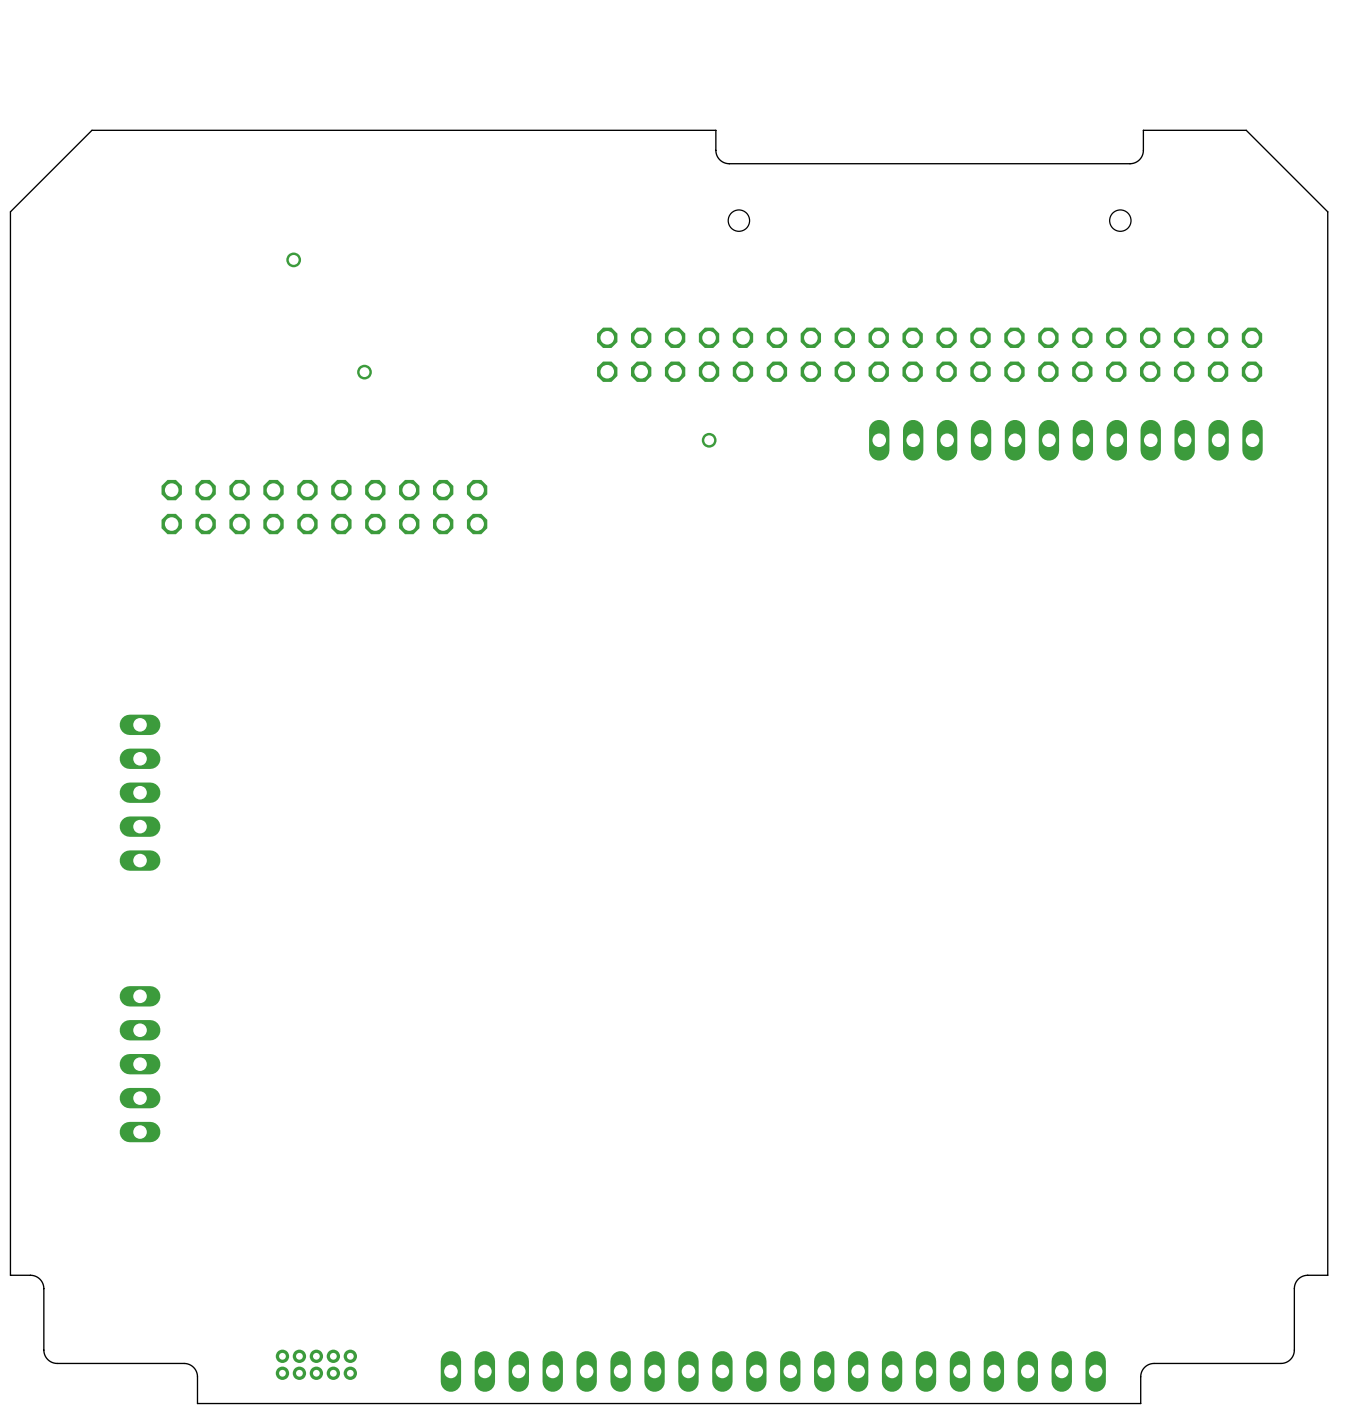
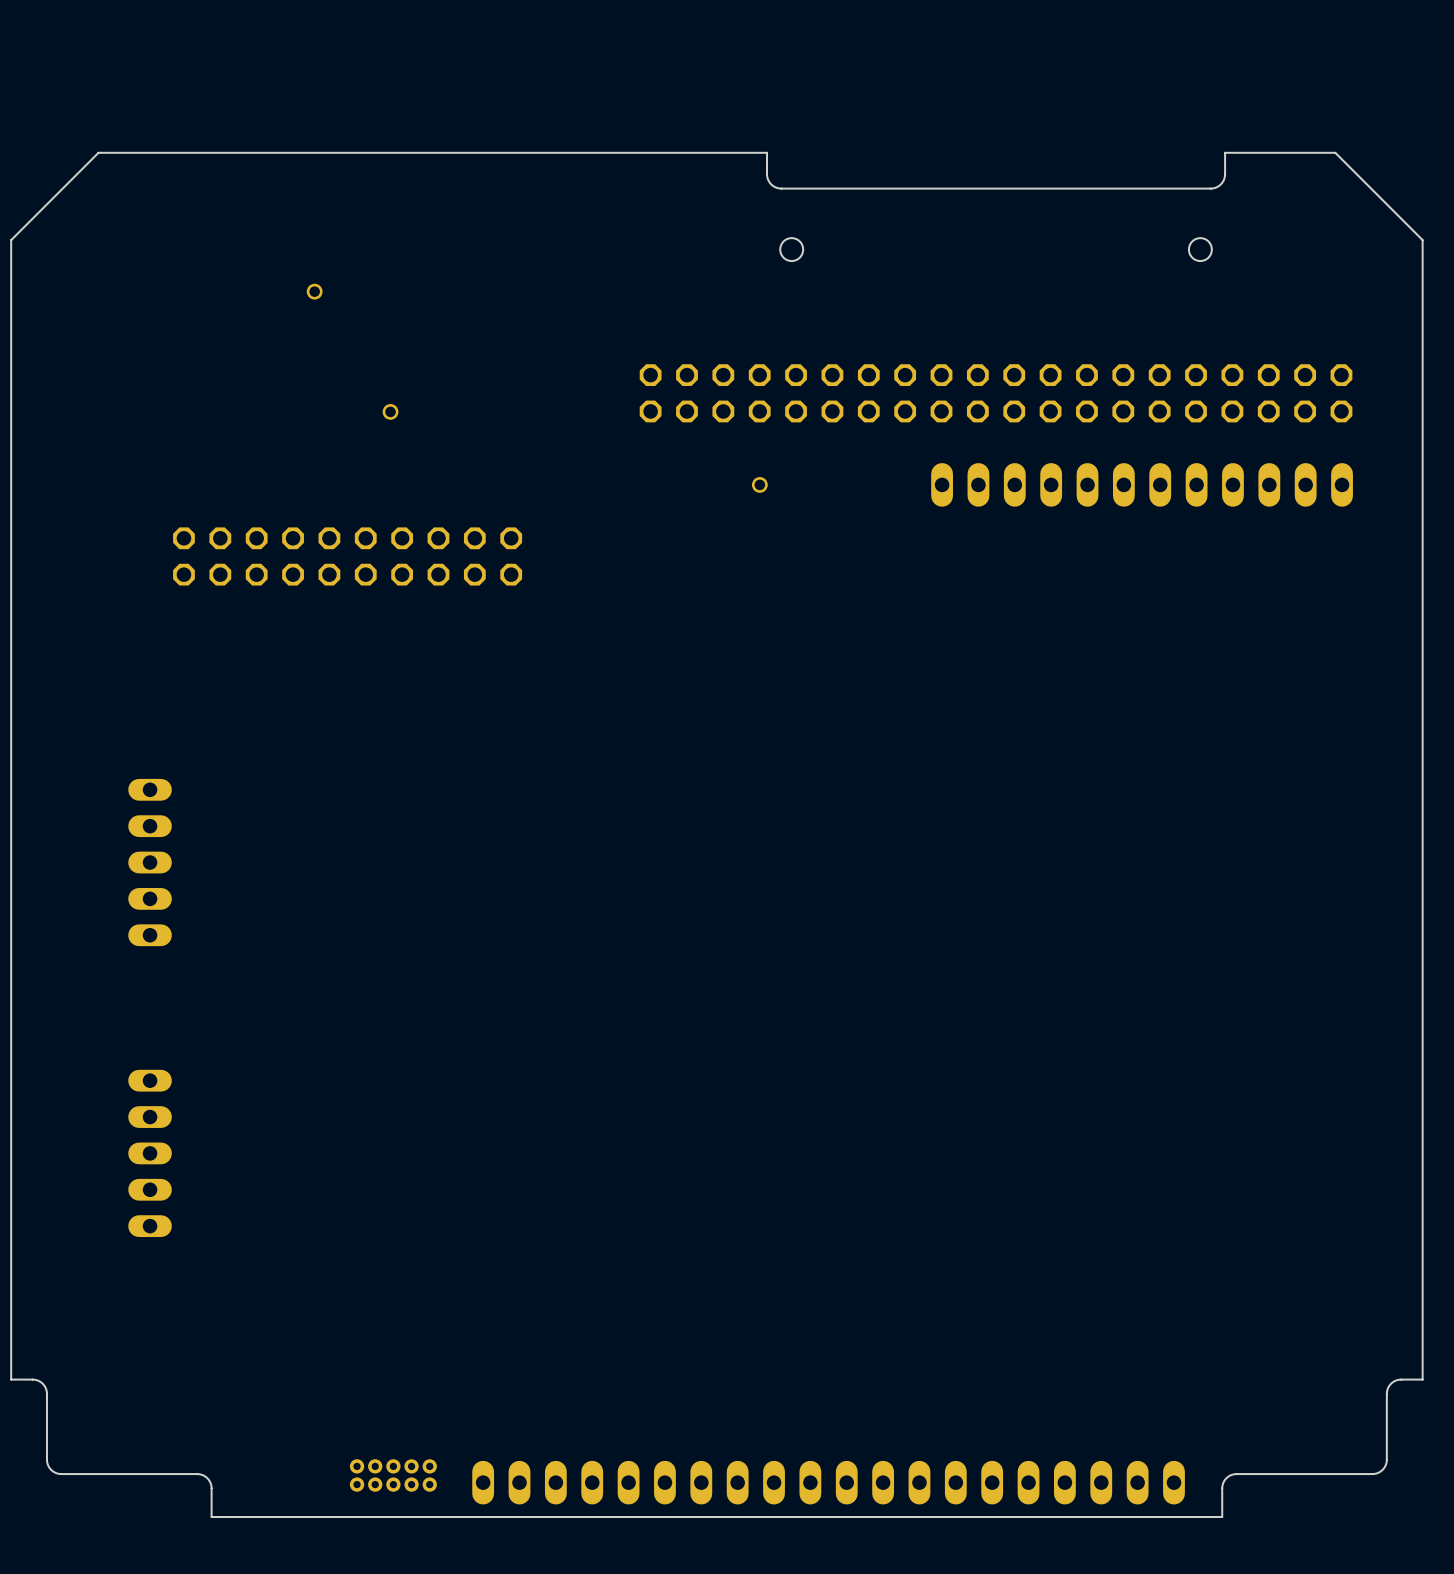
part position: (316, 1364) -> (393, 1475)

